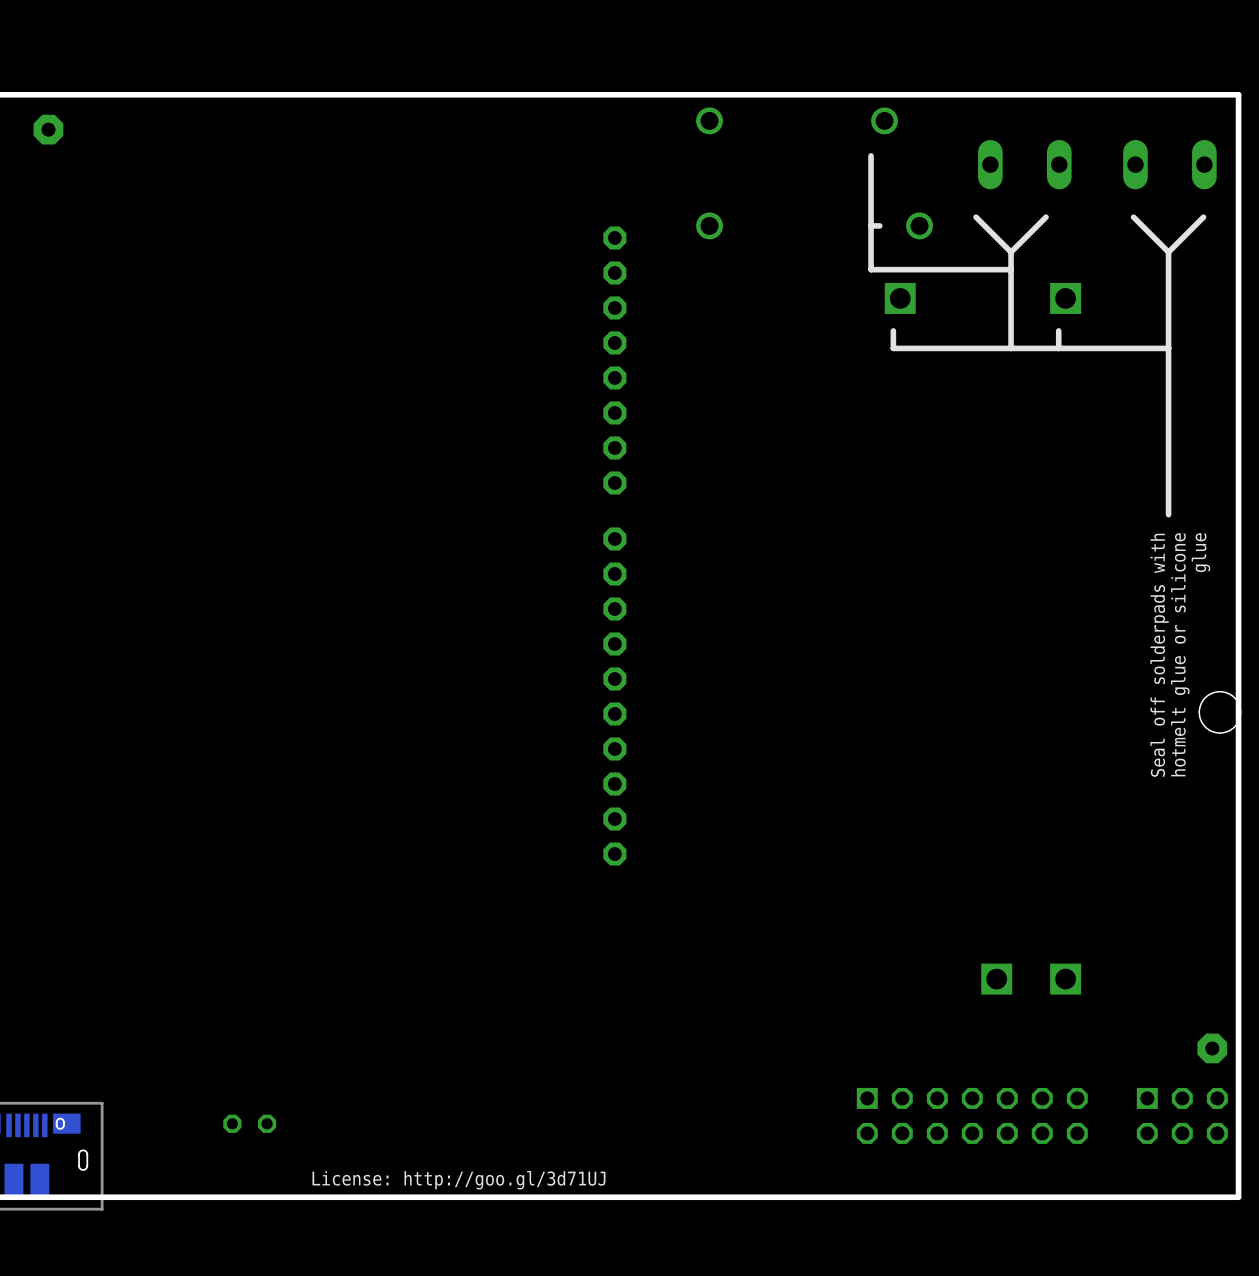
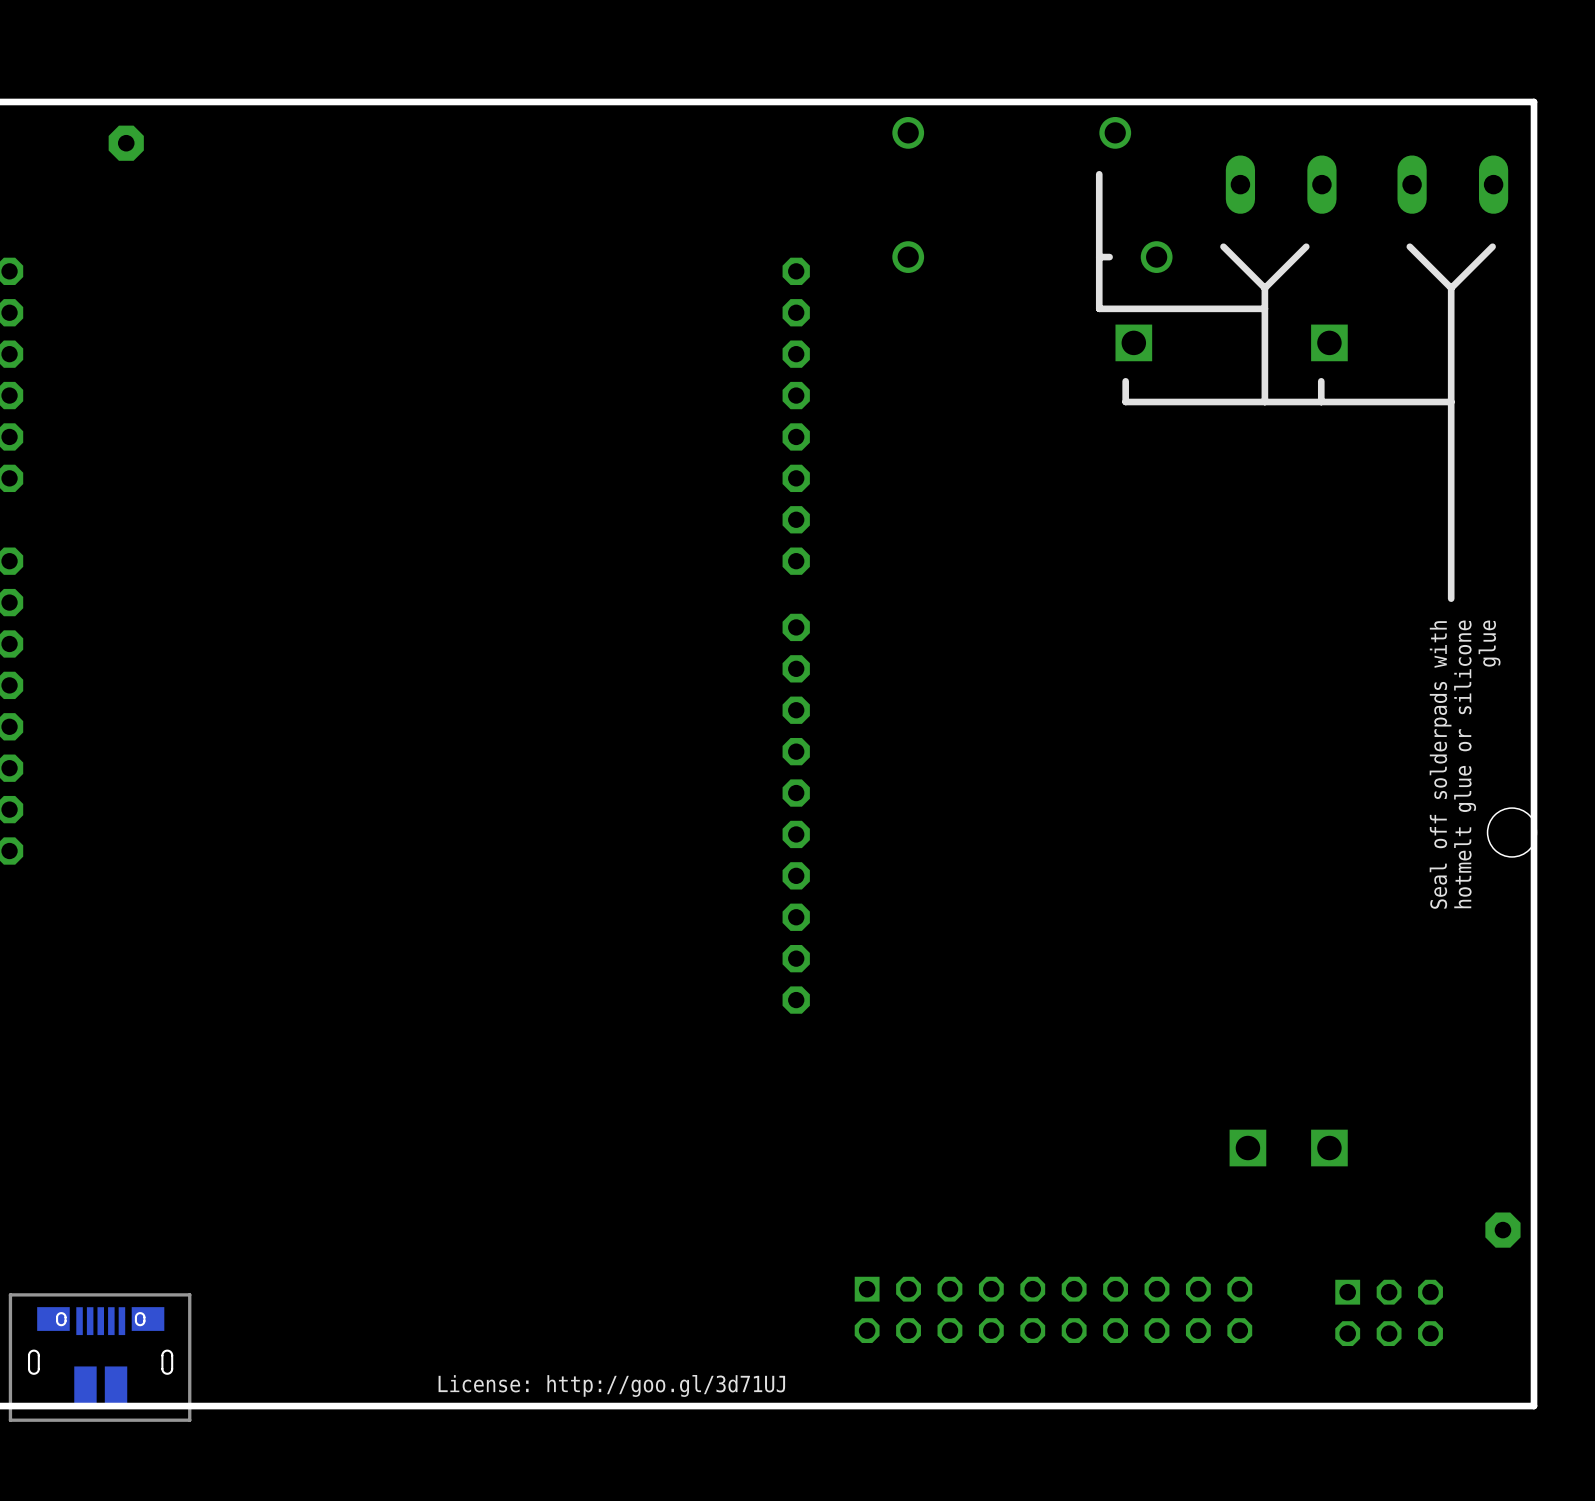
part: none -> (1053, 1309)
part: (972, 1115) -> none
part position: (1182, 1115) -> (1389, 1312)
part: (249, 1123) -> none

